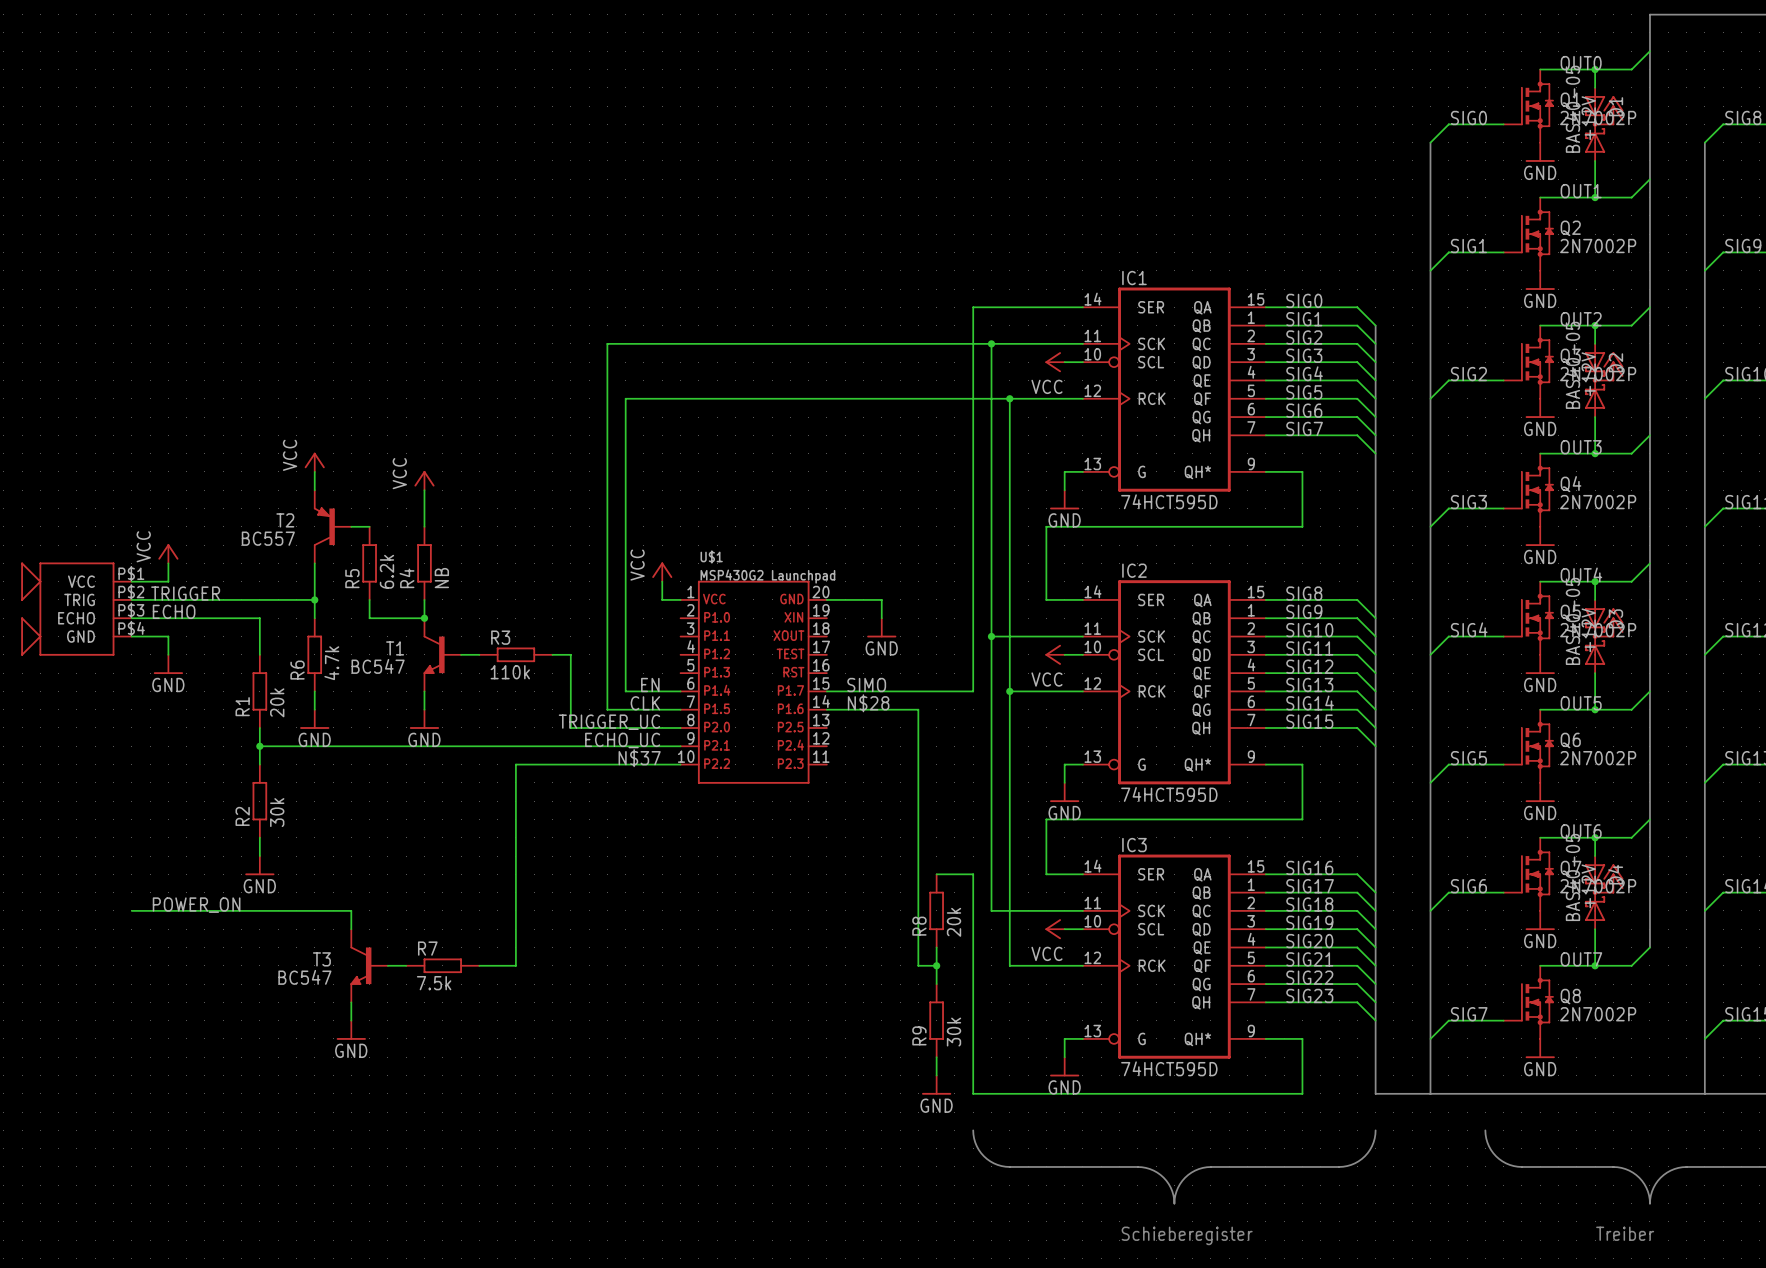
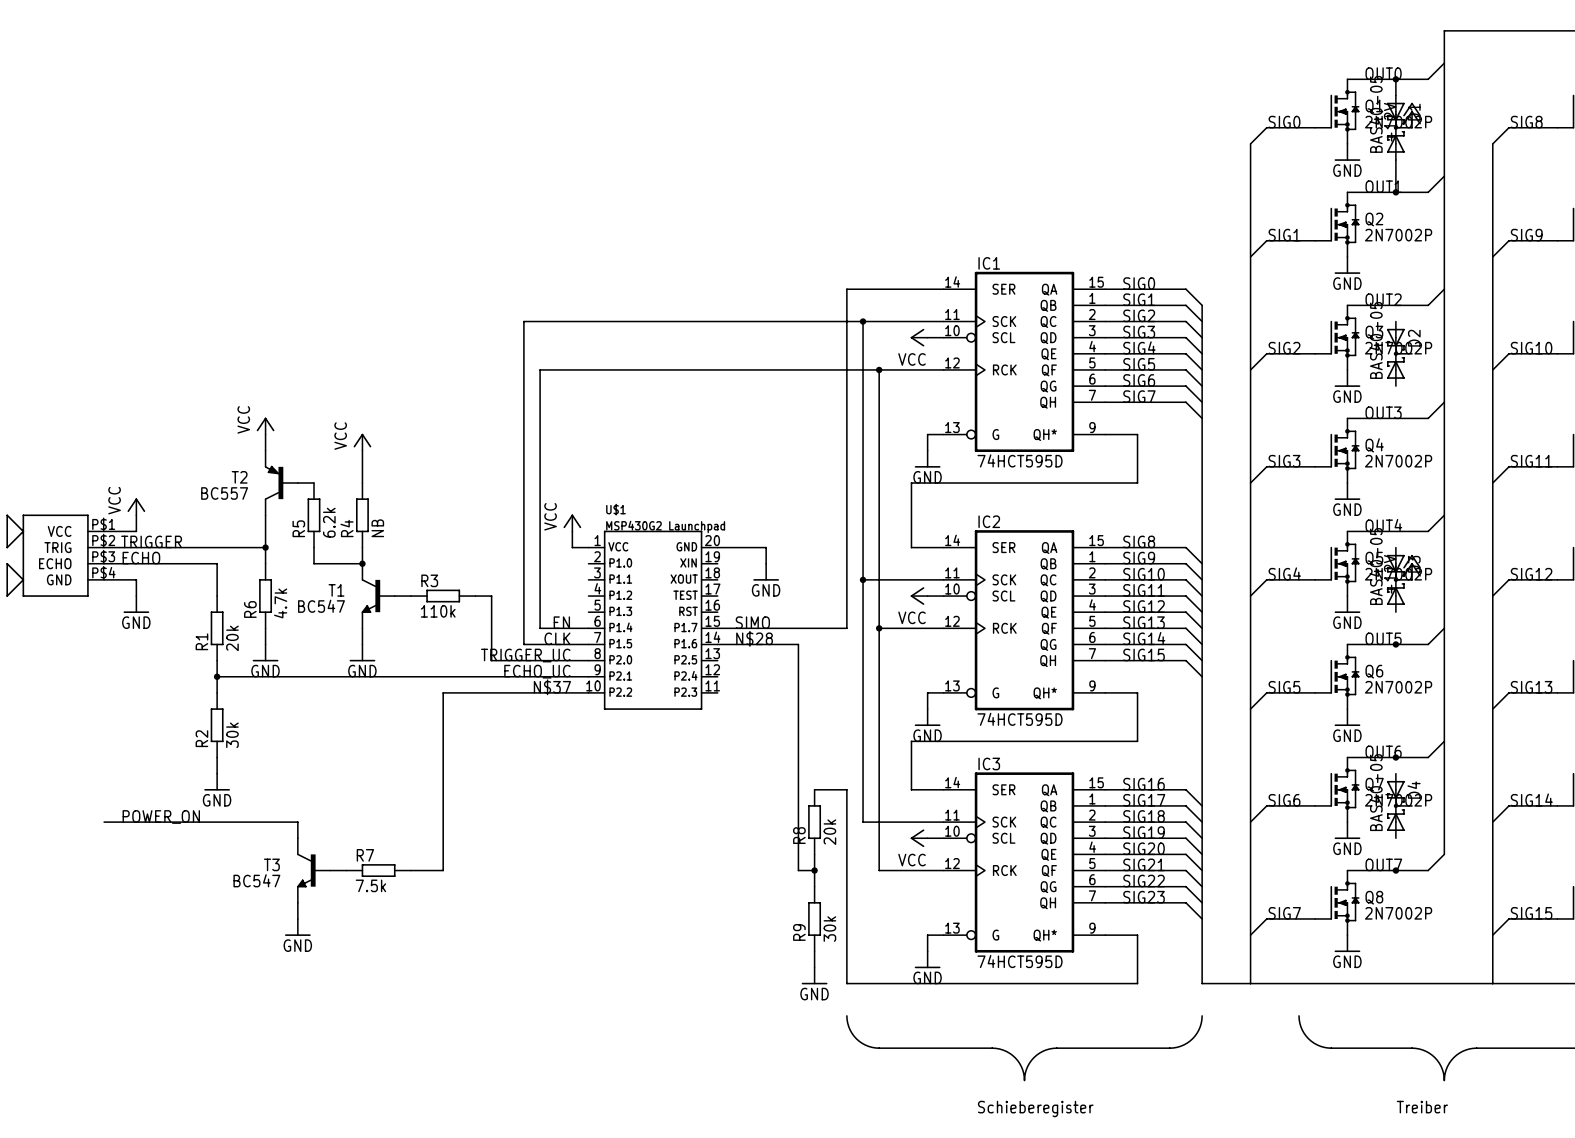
wire: (1595, 325) (1595, 343) -> none
junction: (1595, 325) -> none
power symbol: +12V (1613, 366) -> none
wire: (1595, 417) (1595, 453) -> none
junction: (1595, 453) -> none
wire: (1595, 581) (1595, 599) -> none
junction: (1595, 581) -> none
wire: (1595, 673) (1595, 709) -> none
wire: (1595, 837) (1595, 856) -> none
power symbol: +12V (1613, 878) -> none
wire: (1595, 929) (1595, 965) -> none

